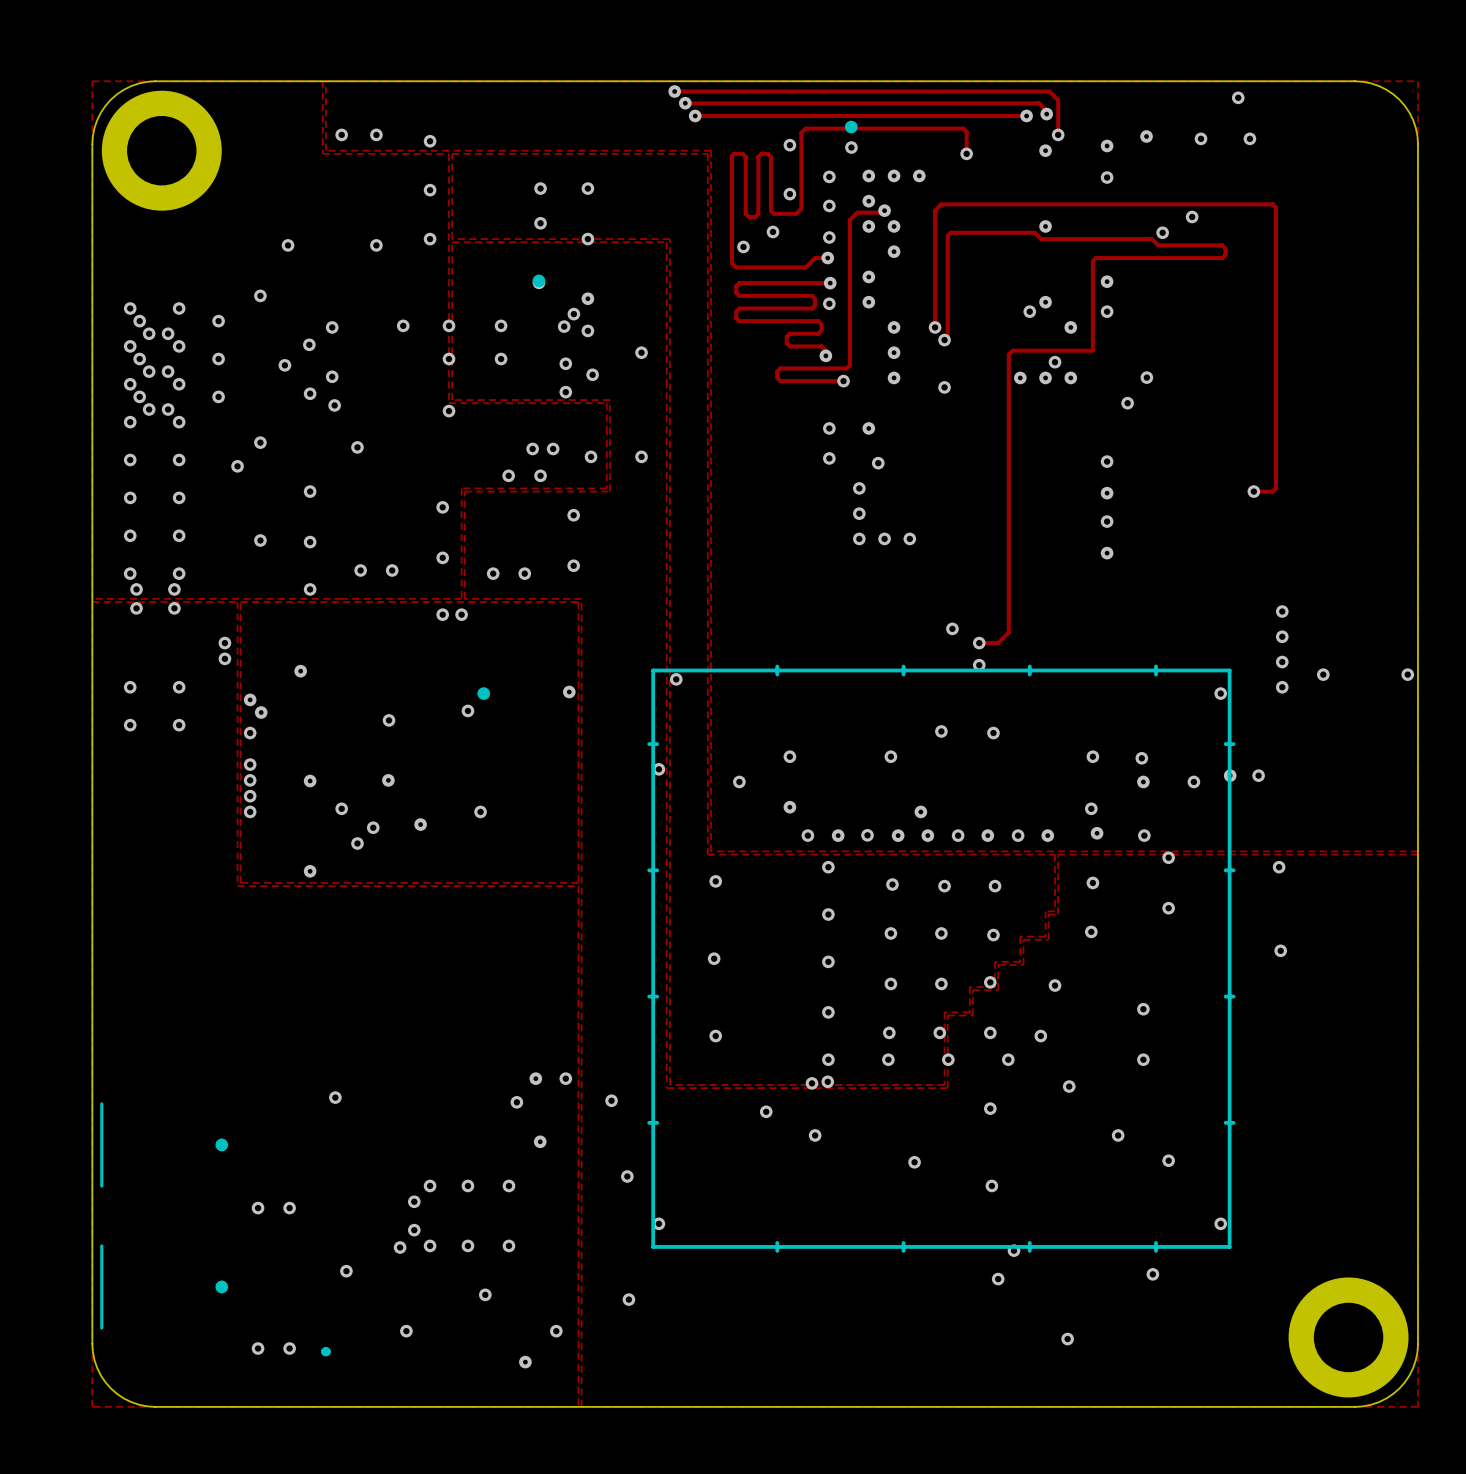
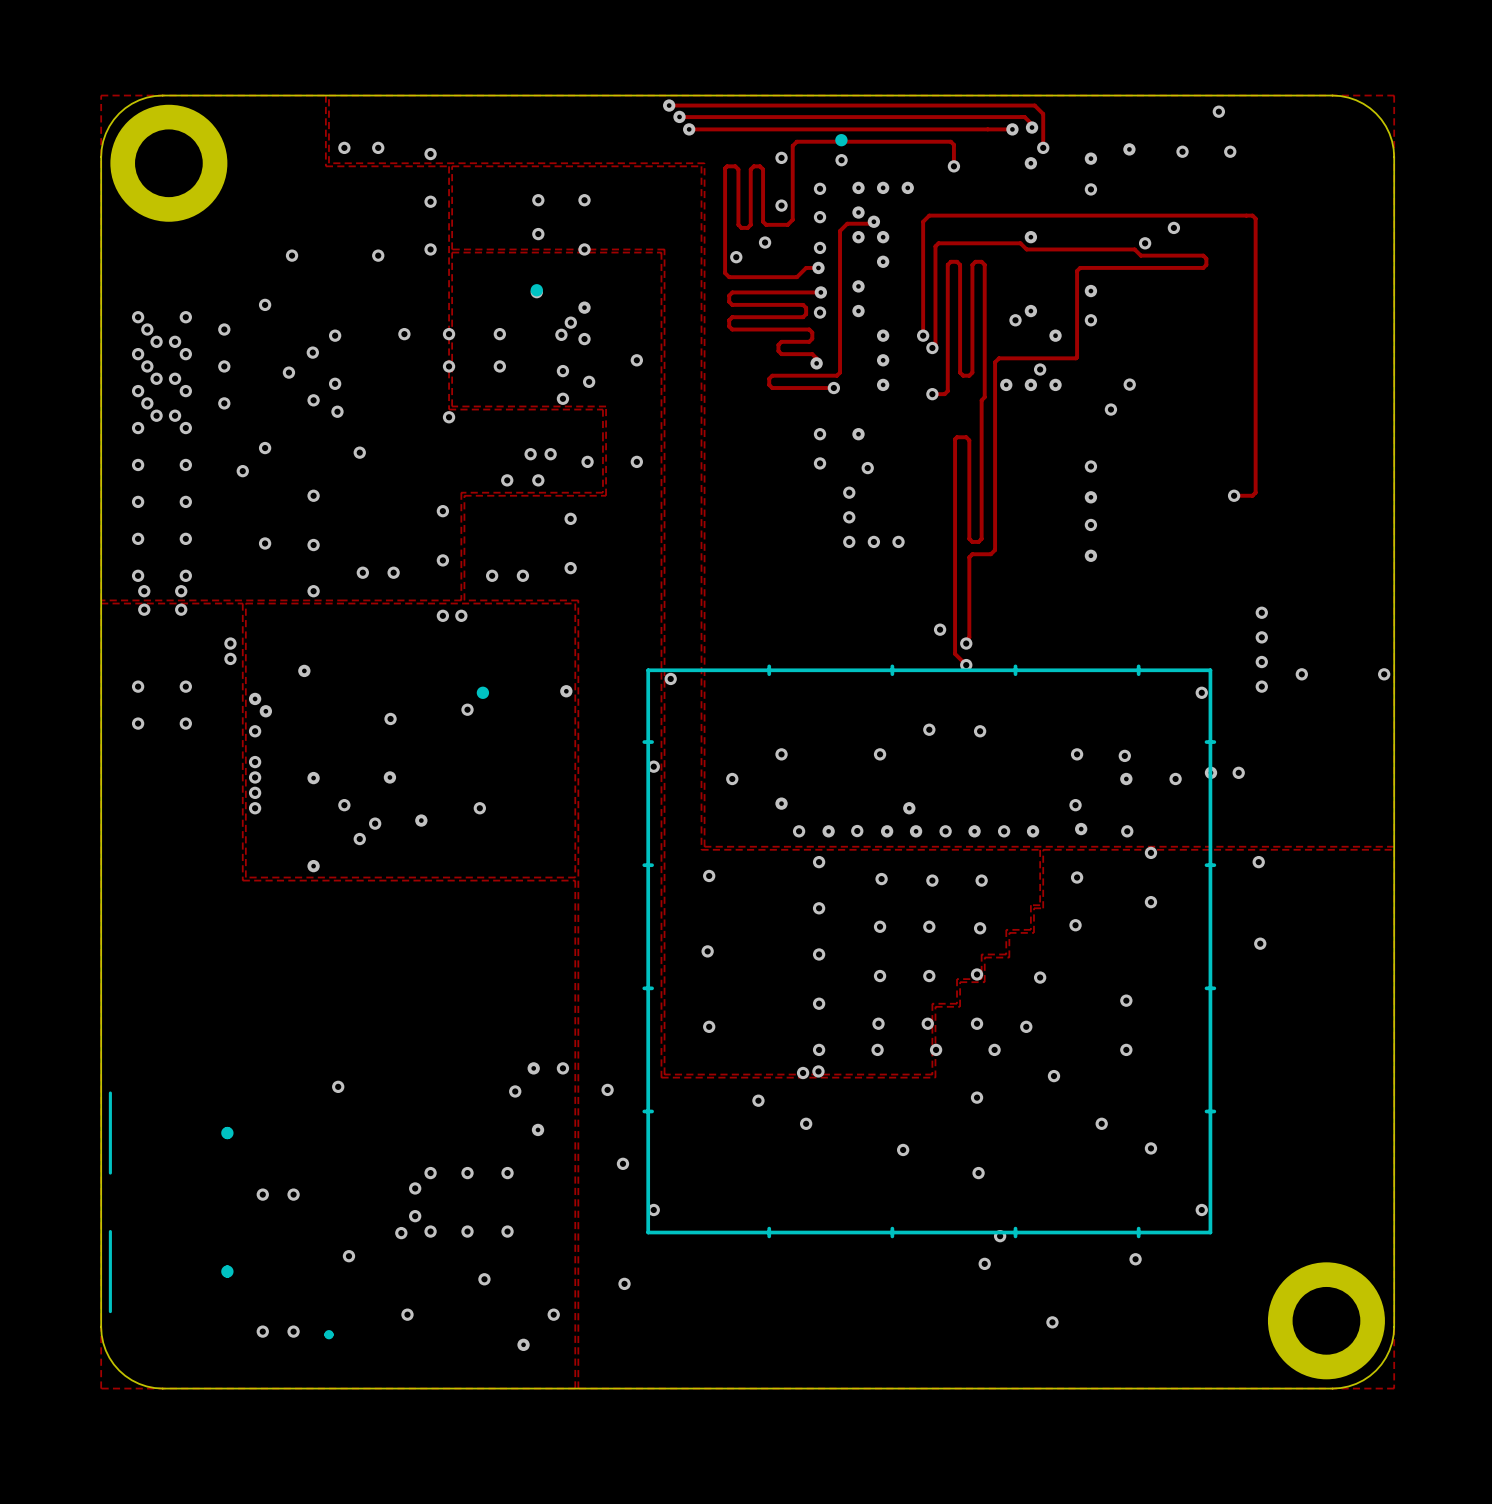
track: none -> (932, 394) (944, 394) (947, 391) (947, 264) (950, 261) (957, 261) (960, 264) (960, 372) (963, 375) (969, 375) (972, 372) (972, 264) (975, 261) (981, 261) (984, 264) (984, 397) (981, 400) (981, 538) (978, 541) (972, 541) (969, 538) (969, 440) (966, 437) (957, 437) (955, 439) (955, 653) (966, 665)
track: (1008, 547) (1008, 632) (998, 643) (979, 643) -> (995, 550) (990, 554) (972, 554) (969, 557) (969, 637) (966, 643)

